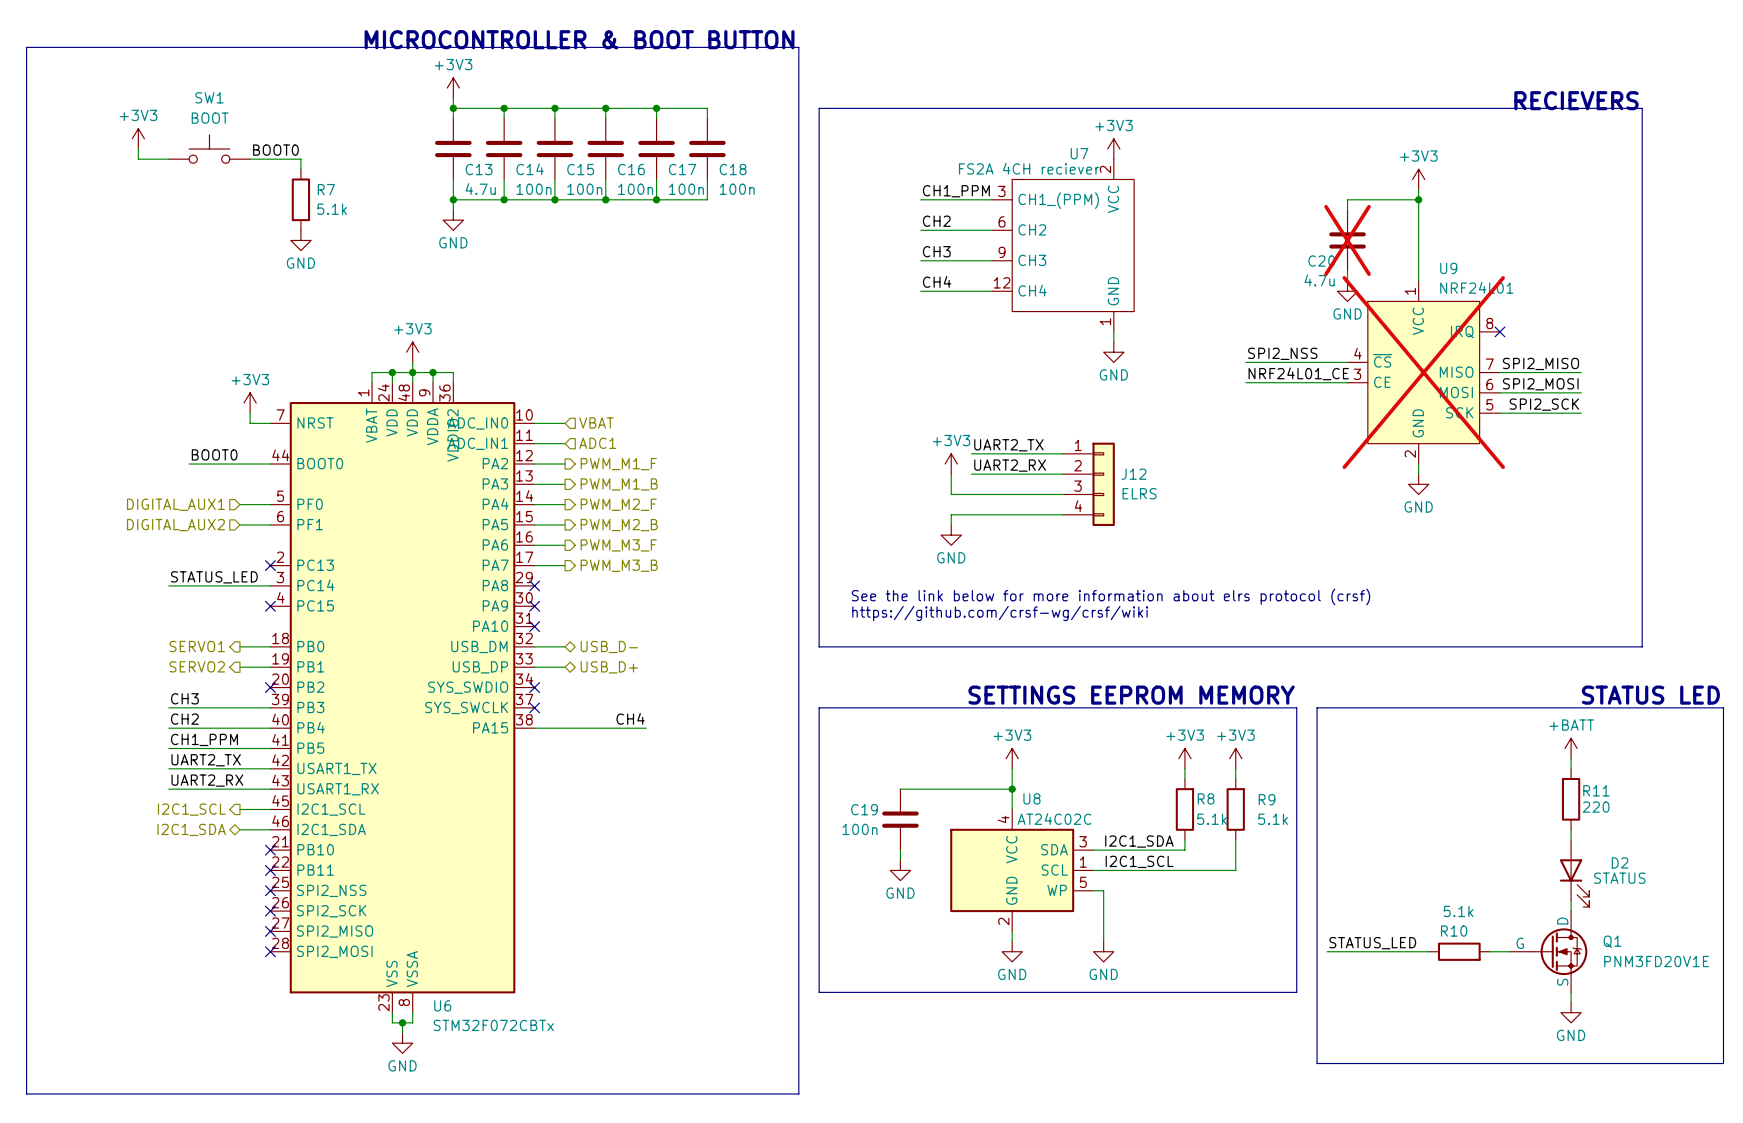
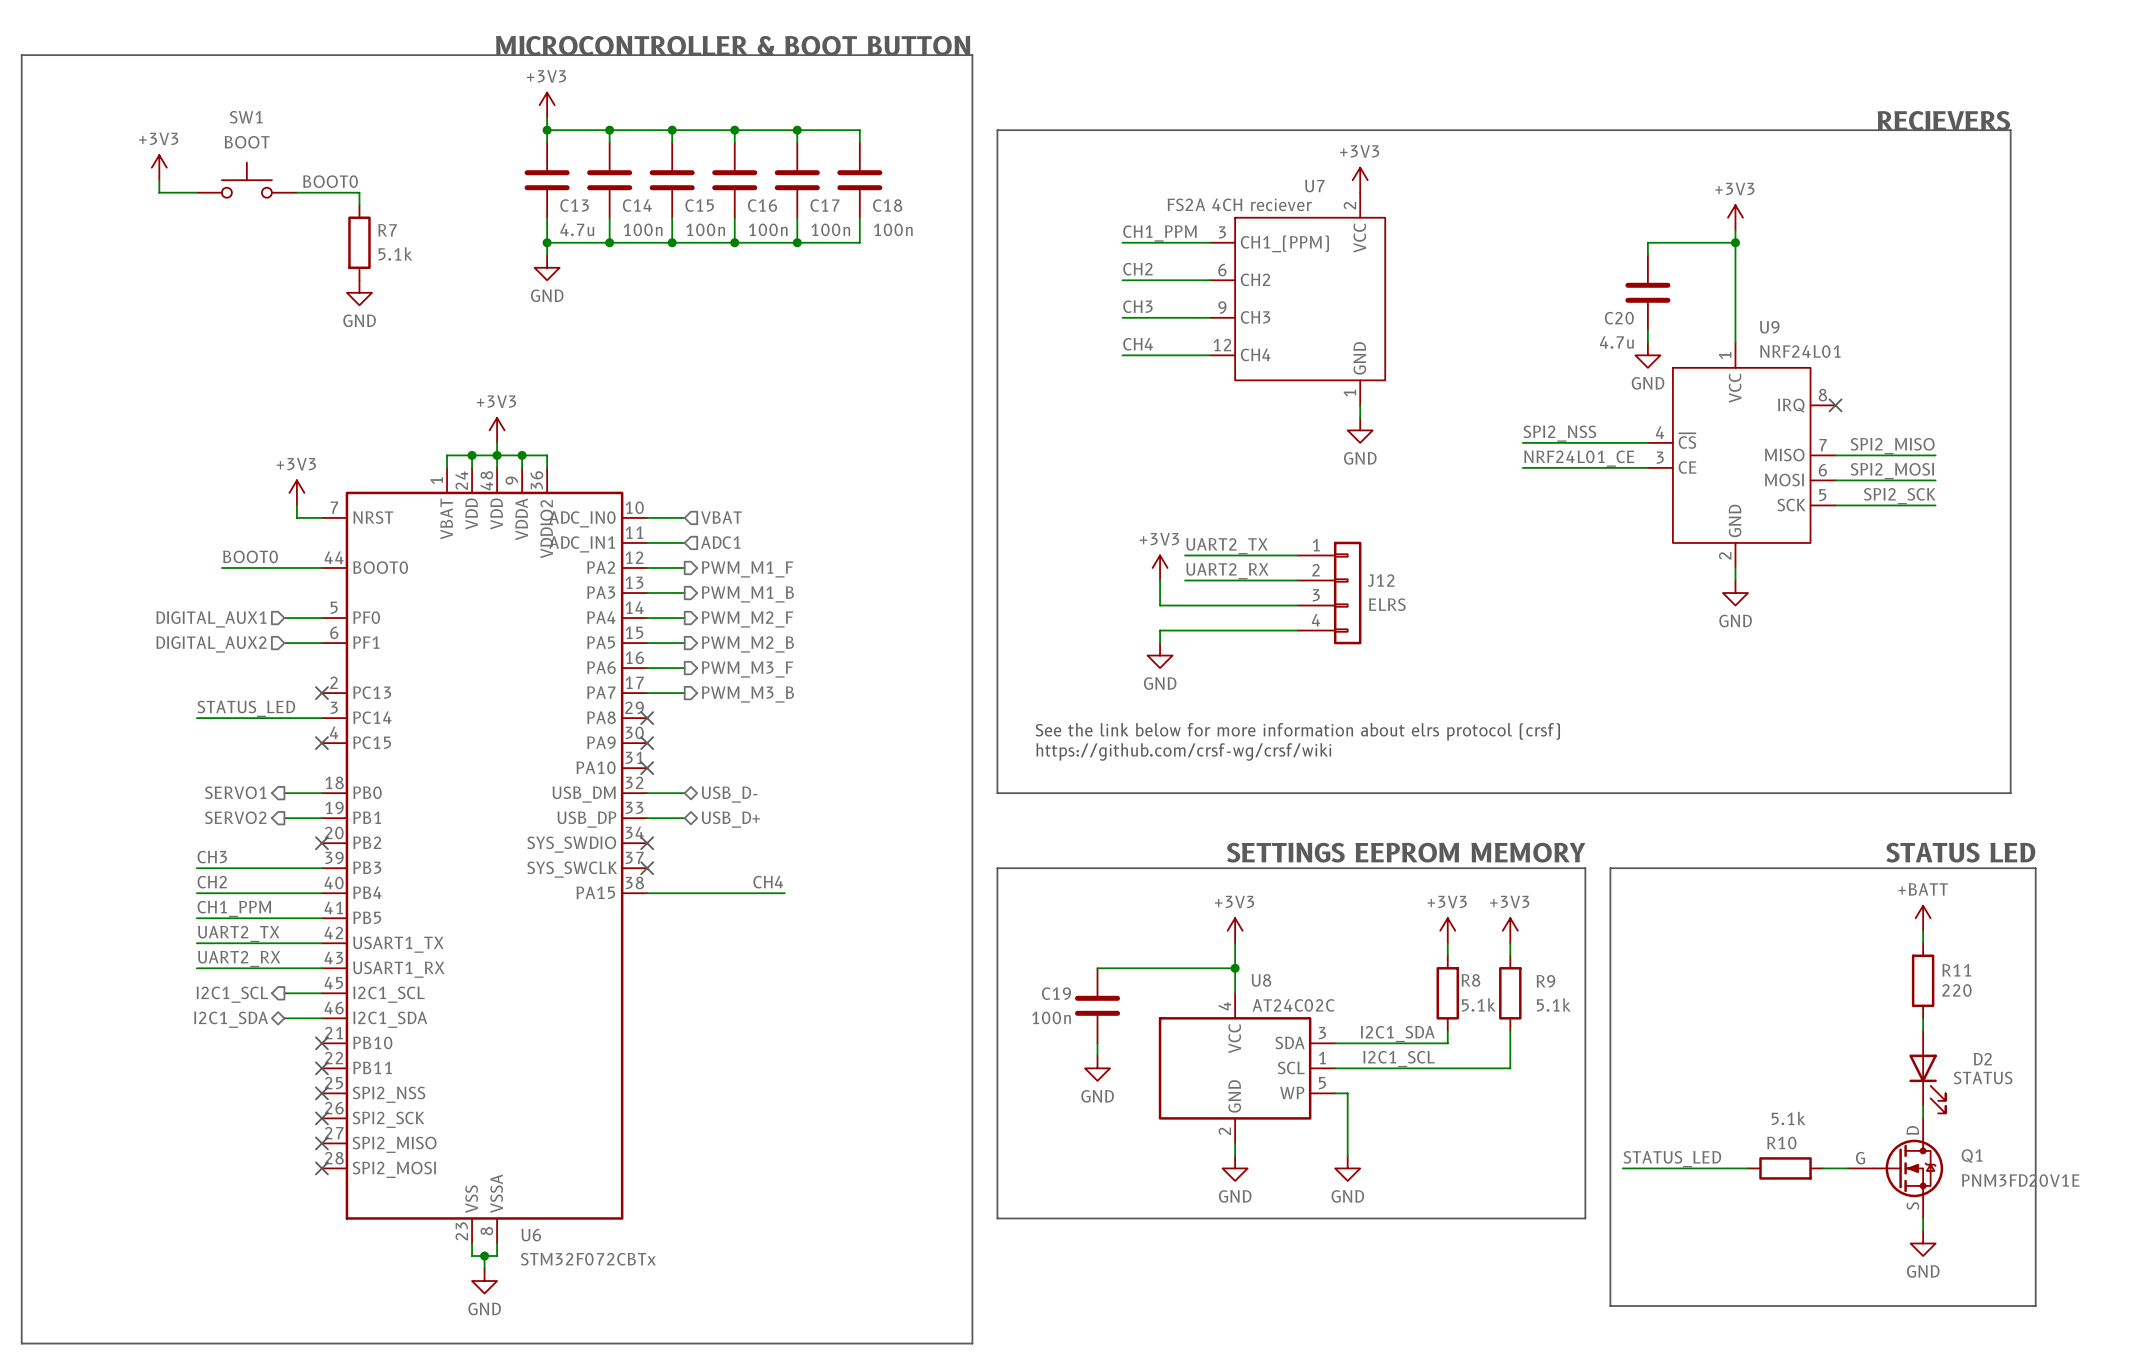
C20 do-not-place cross: (1347, 240) -> none
U9 do-not-place cross: (1423, 372) -> none
text position: STATUS LED (1650, 695) -> STATUS LED (1960, 852)
line: (1662, 707) (1723, 707) (1723, 1063) (1662, 1063) -> (2035, 868) (2035, 1306)

